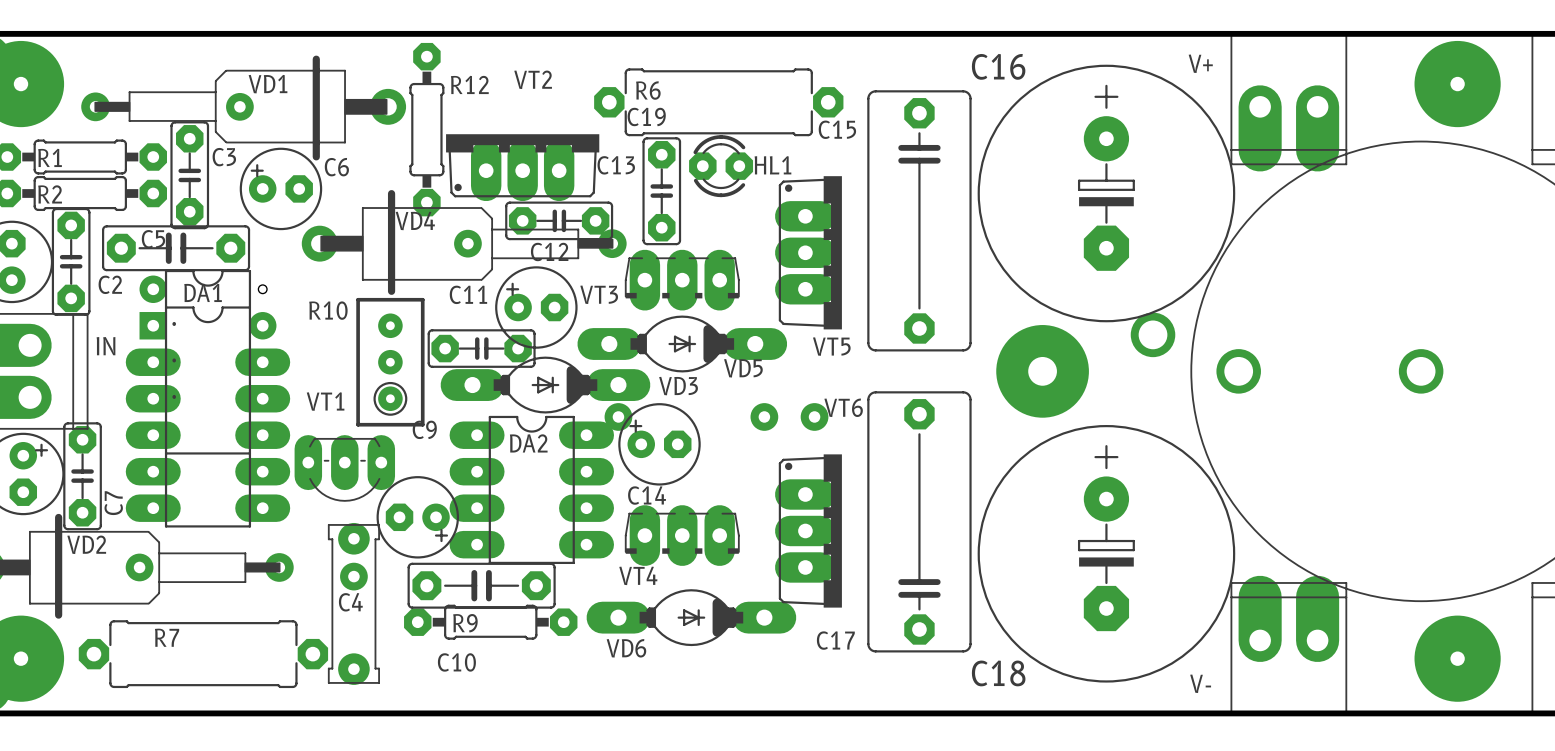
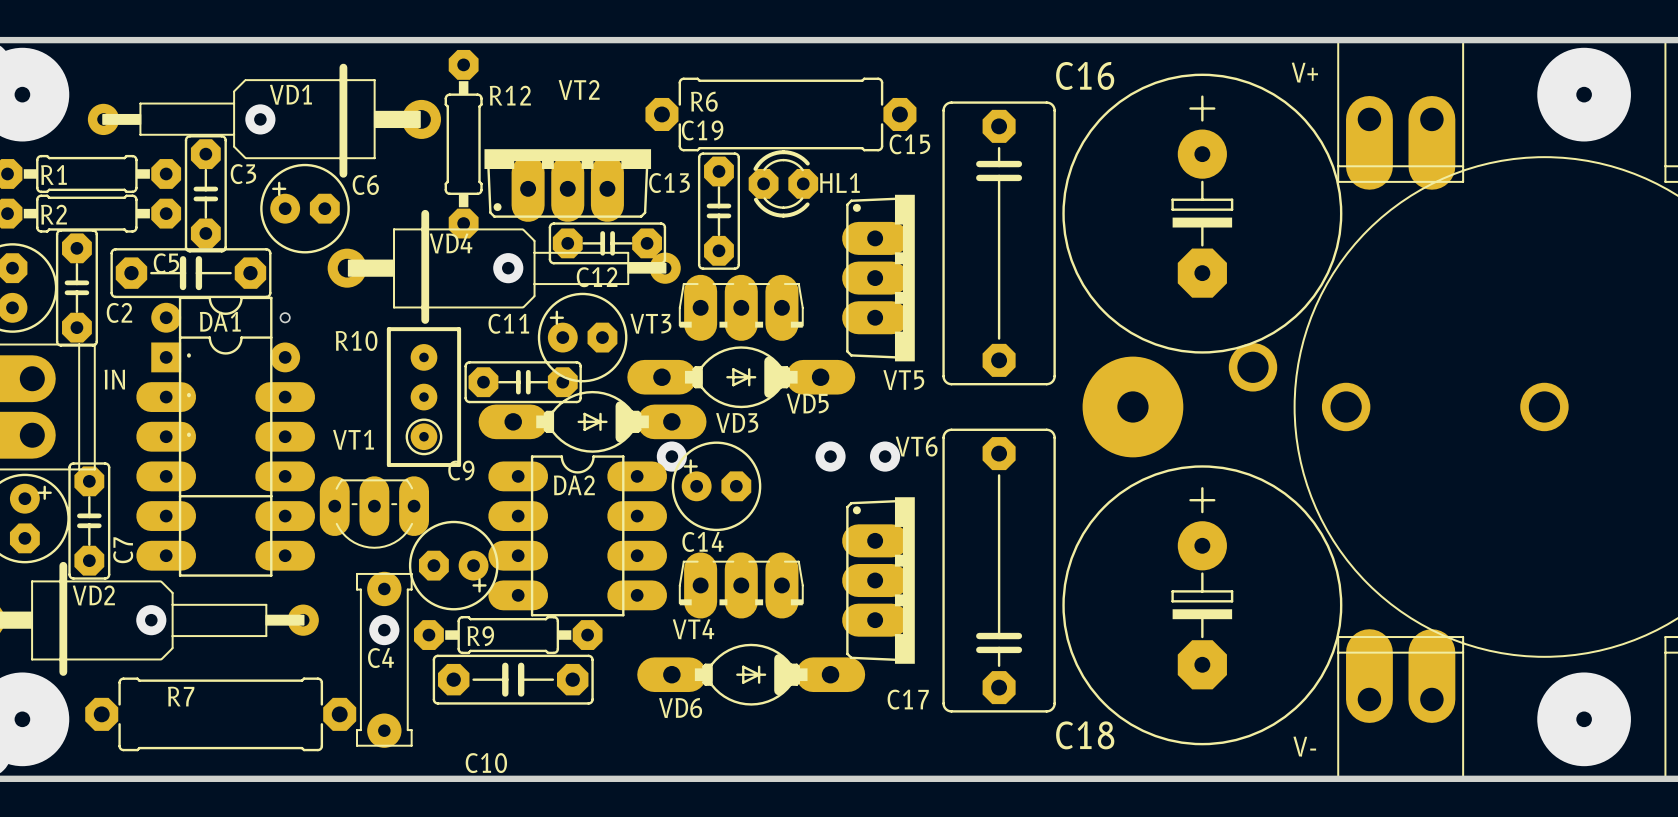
C10 position: (481, 585) -> (513, 679)
R9 position: (490, 622) -> (508, 635)

